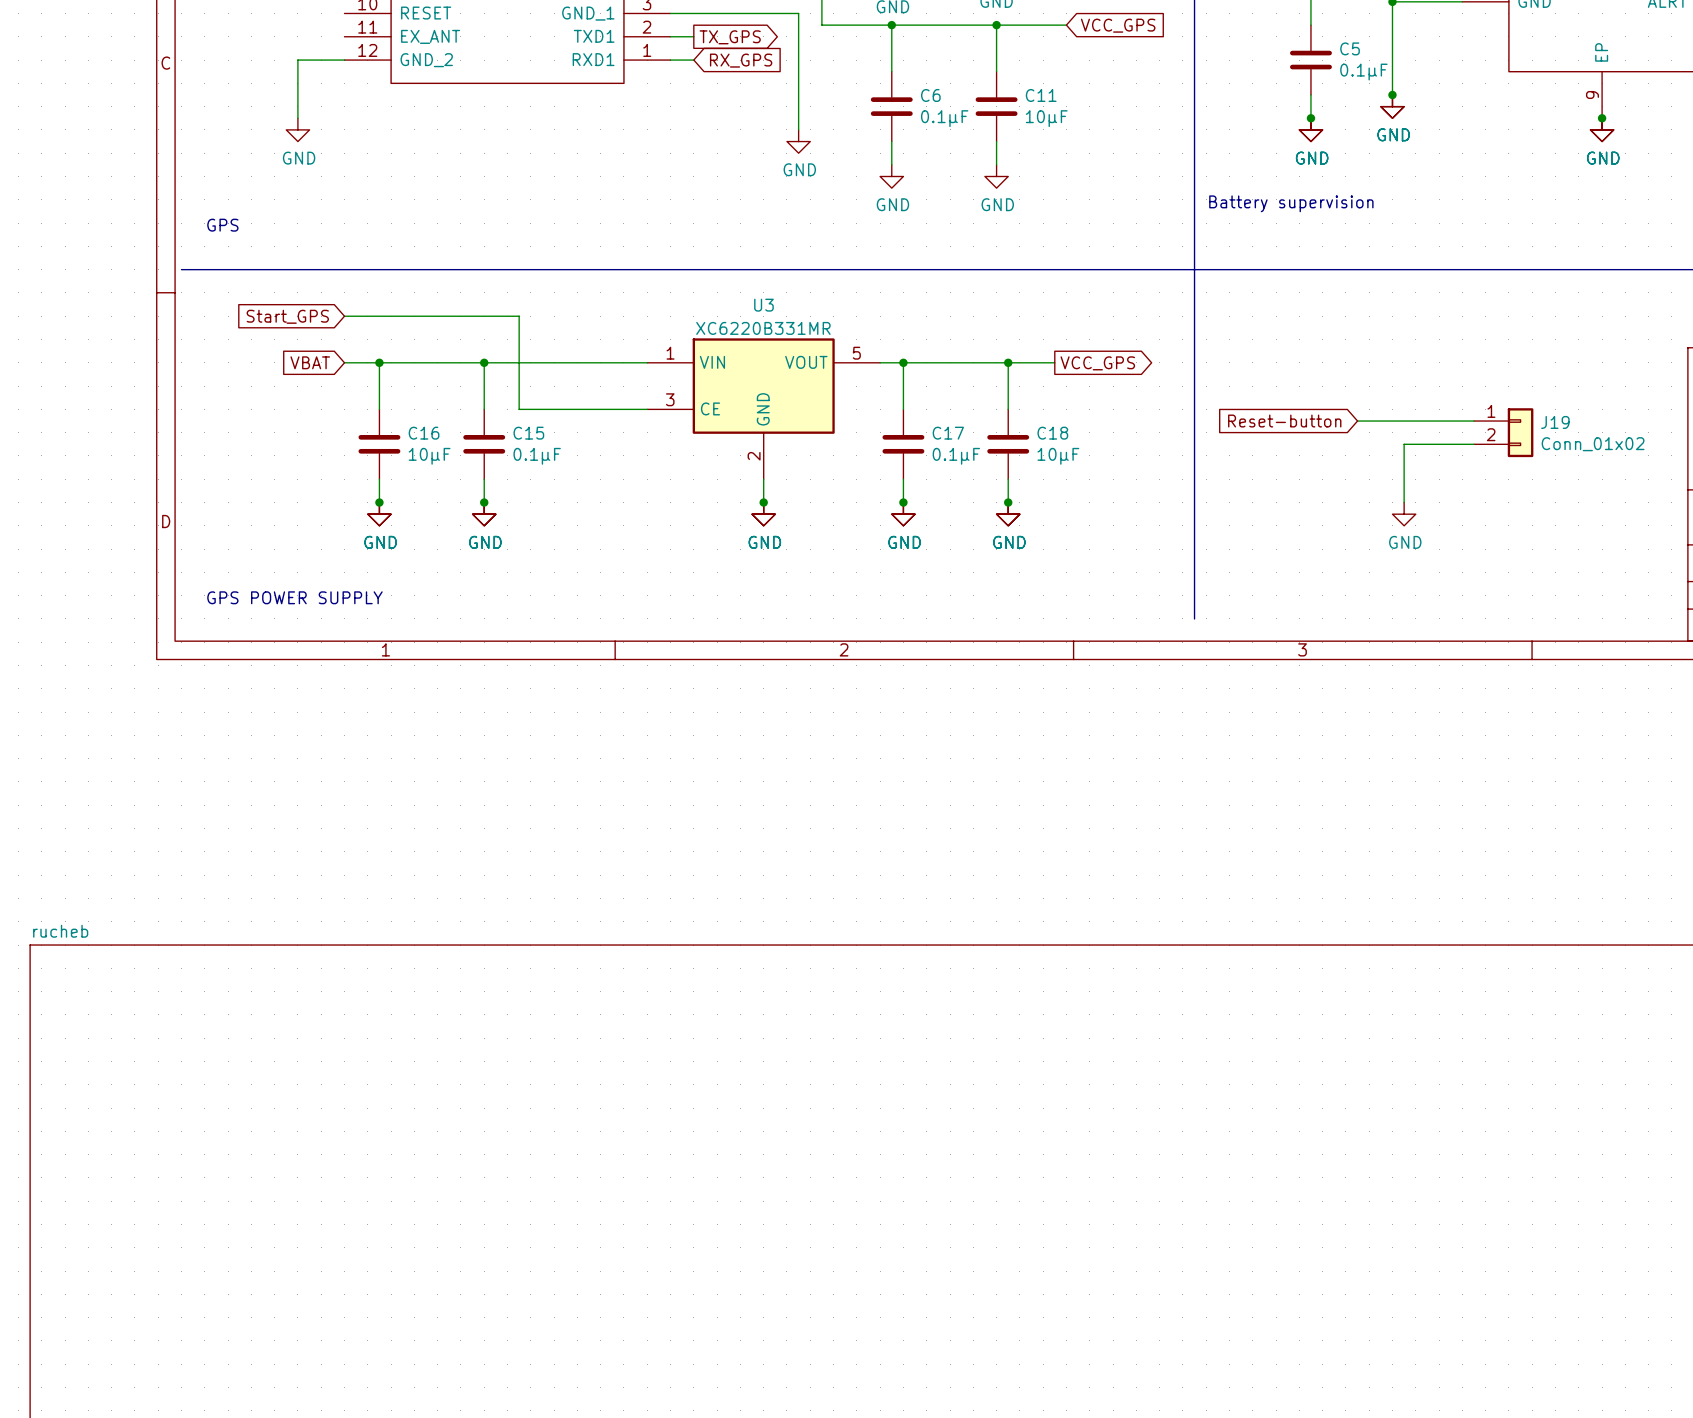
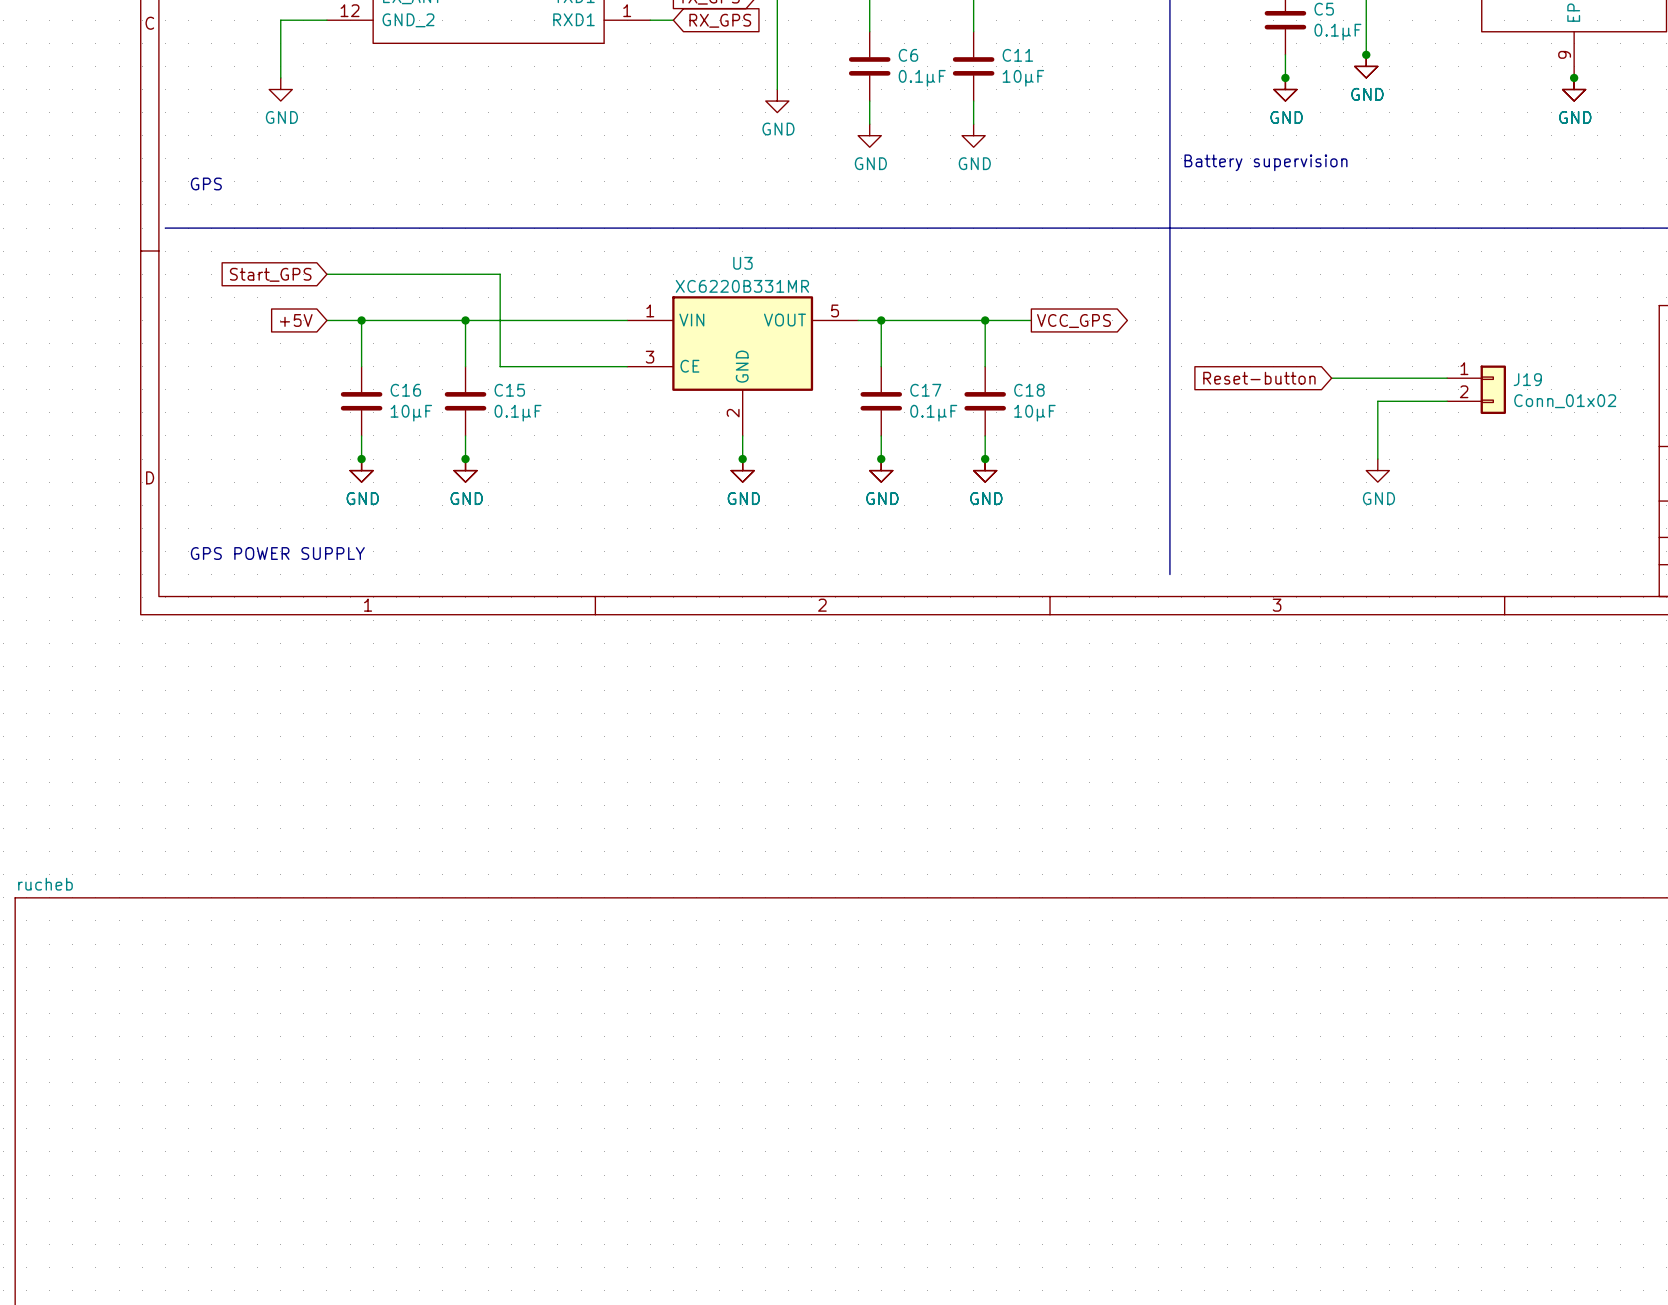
global label: VBAT (310, 362) -> +5V (296, 320)

